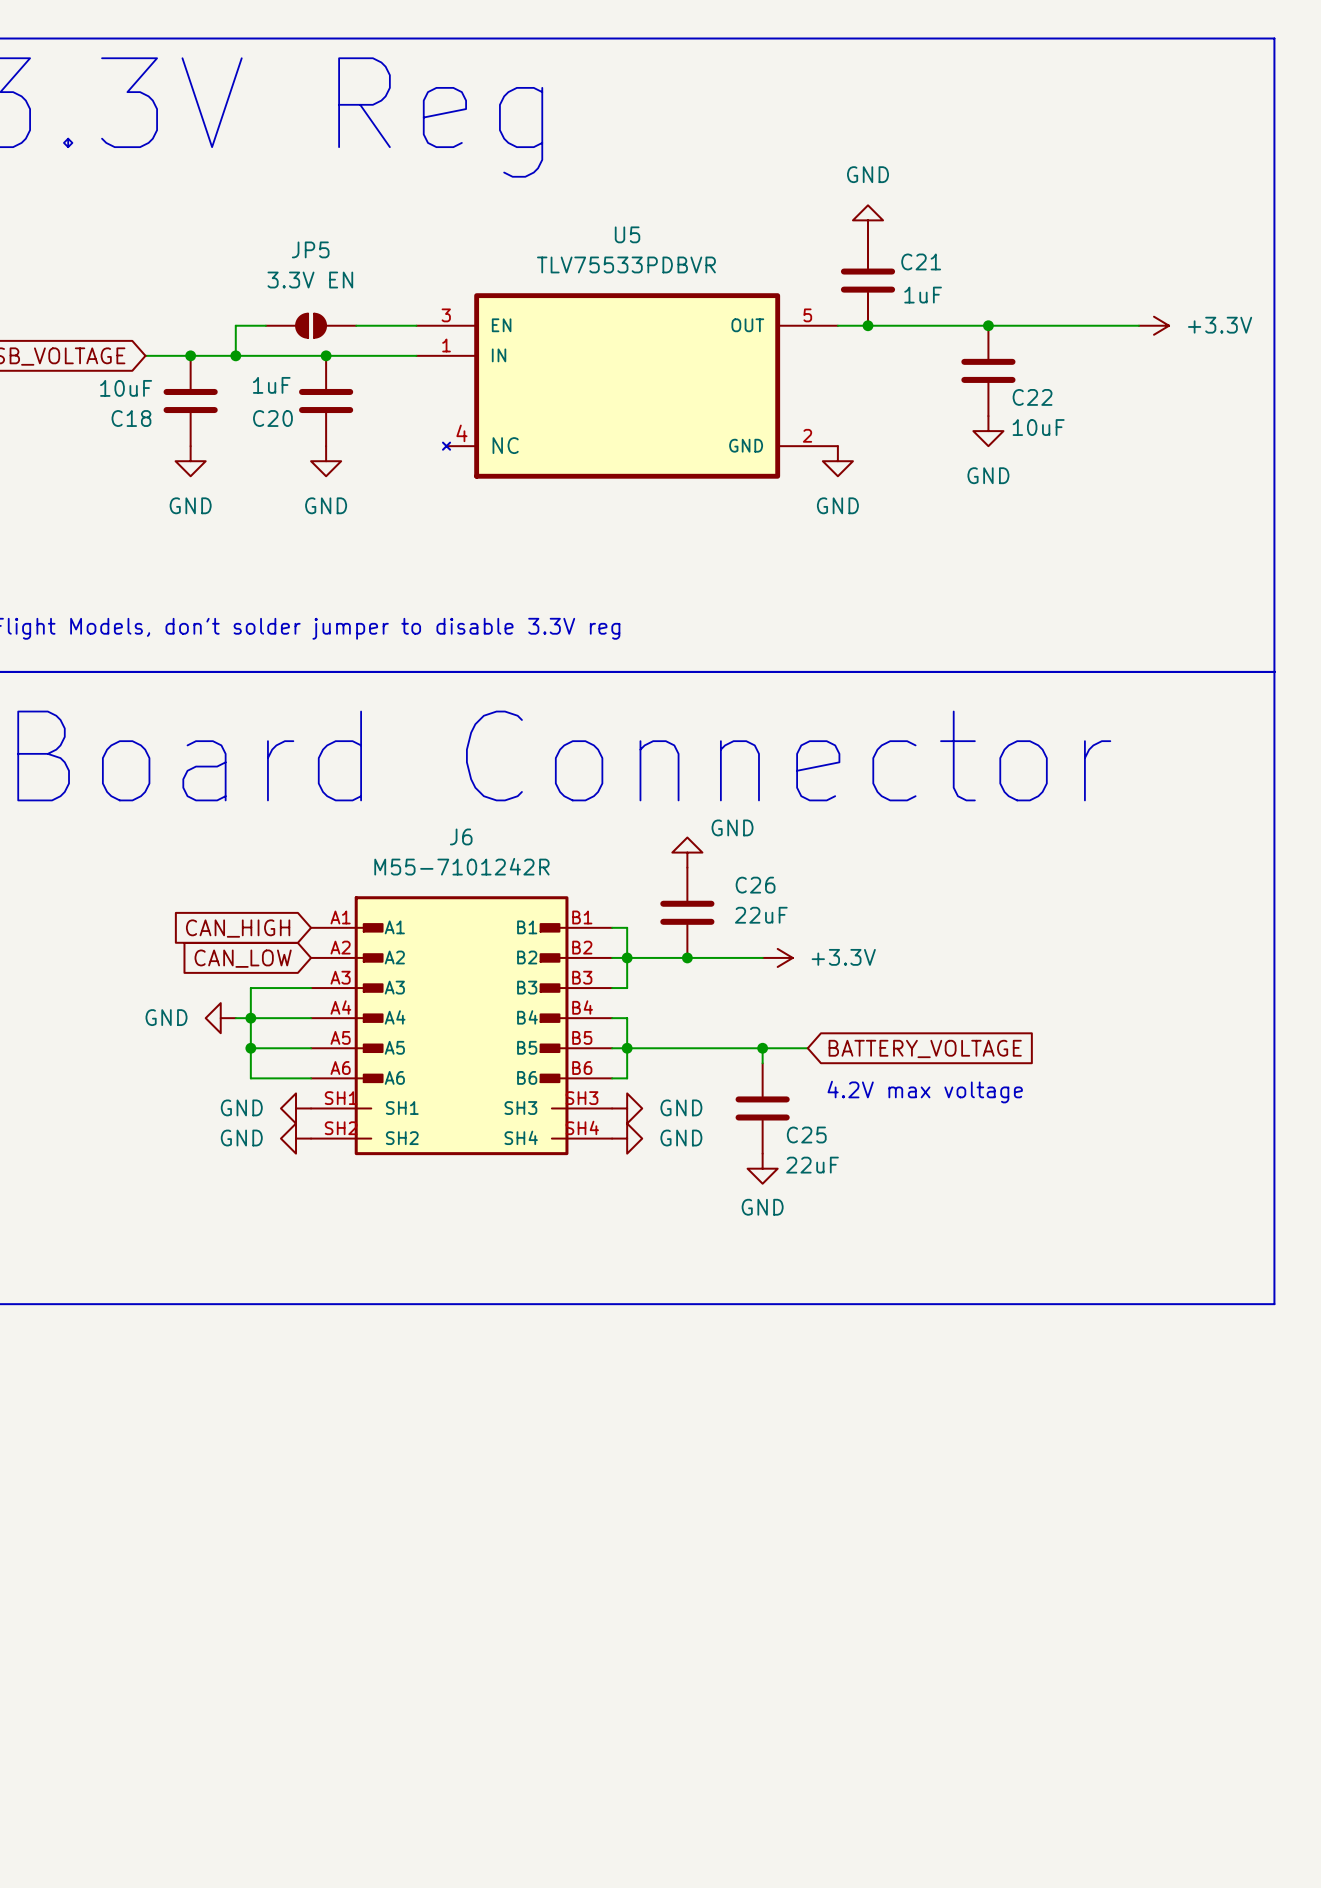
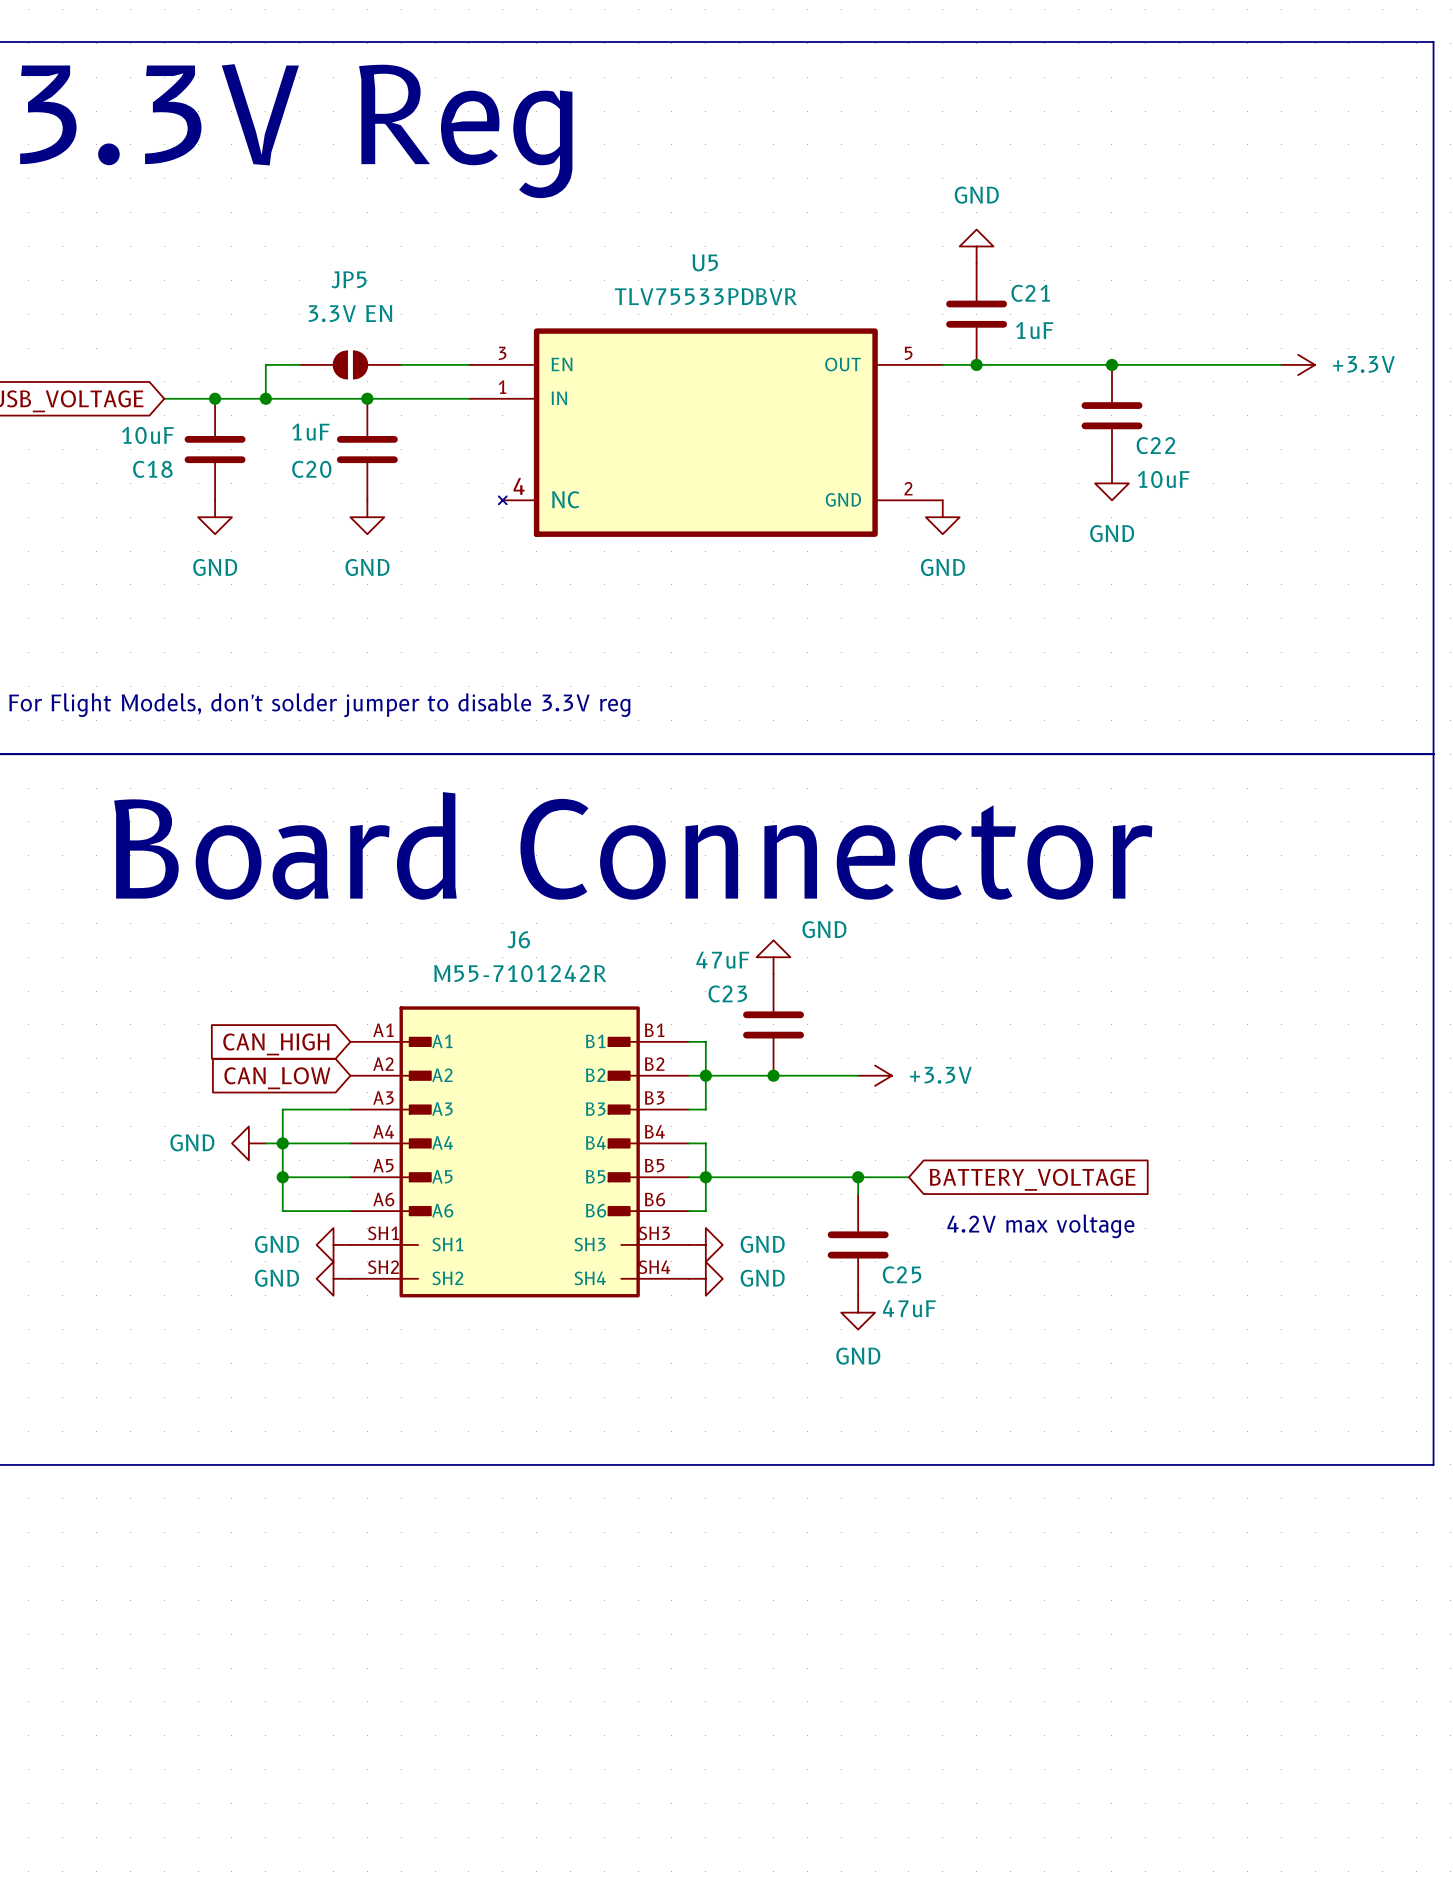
C26 name: C26 (755, 885) -> C23 (727, 993)
C26 value: 22uF (761, 915) -> 47uF (722, 960)
C25 value: 22uF (812, 1165) -> 47uF (909, 1308)

